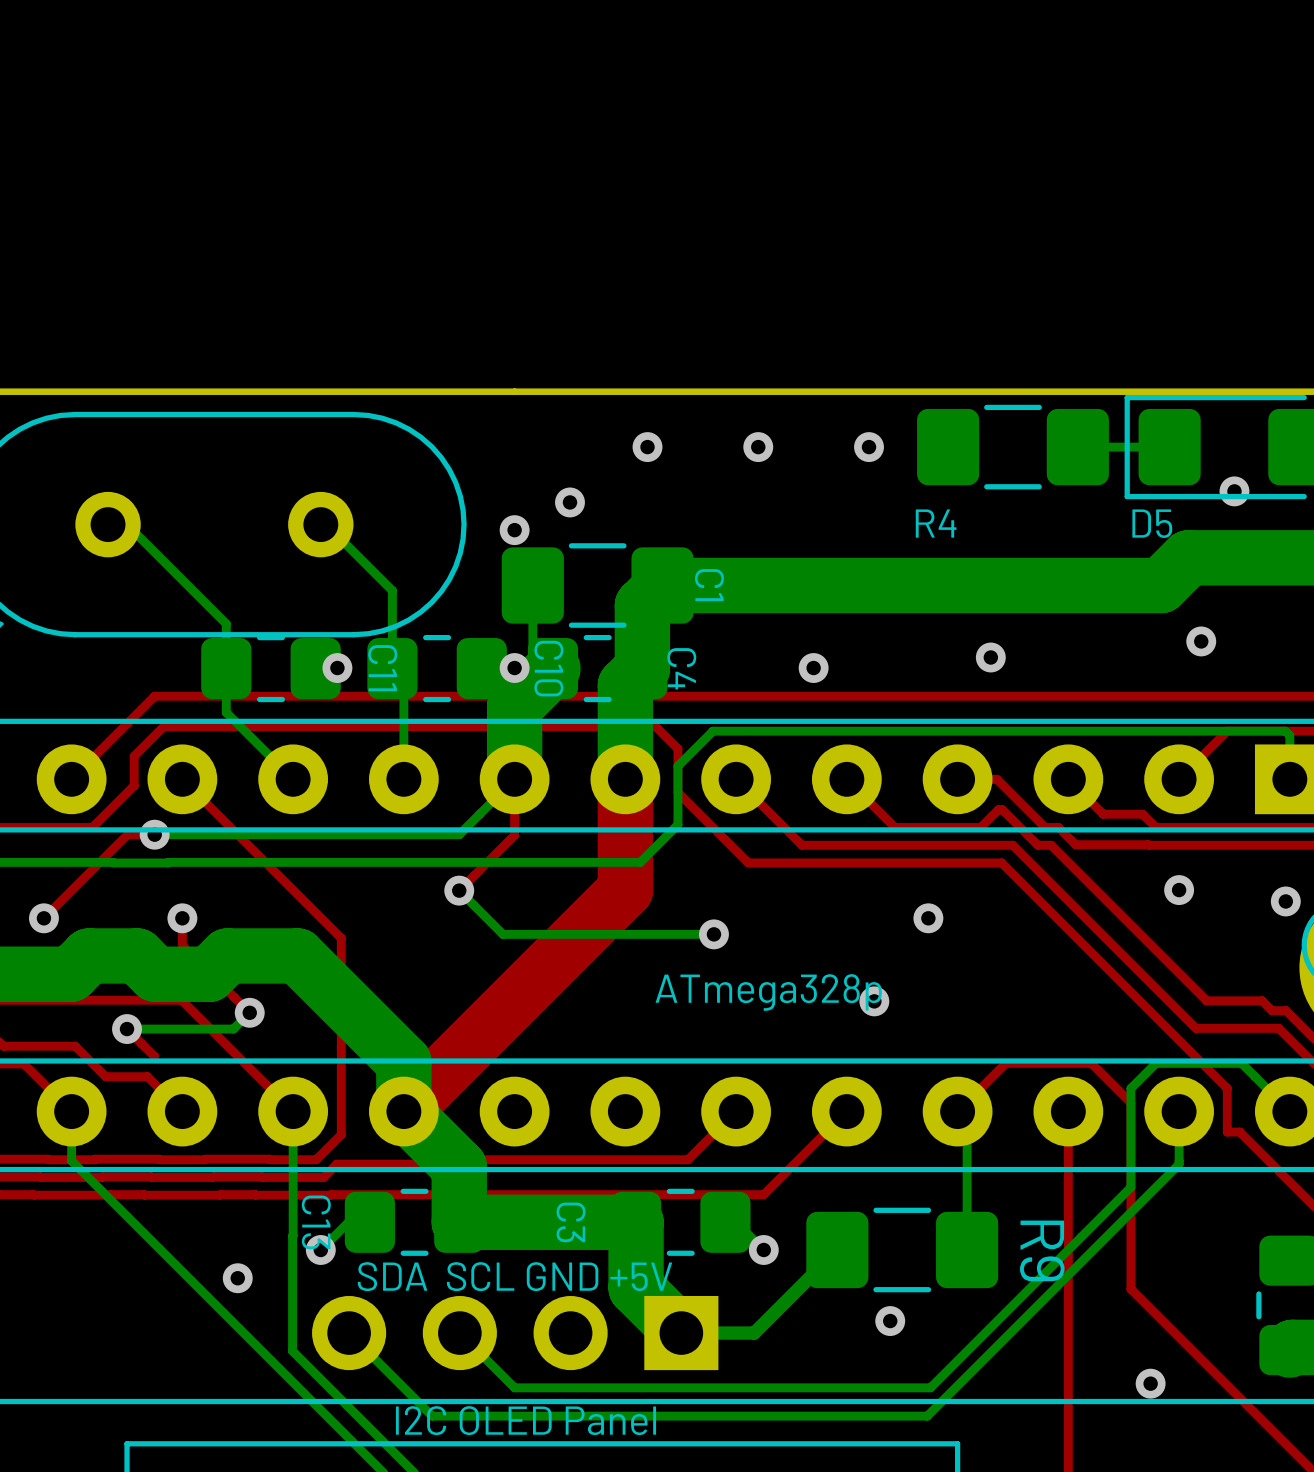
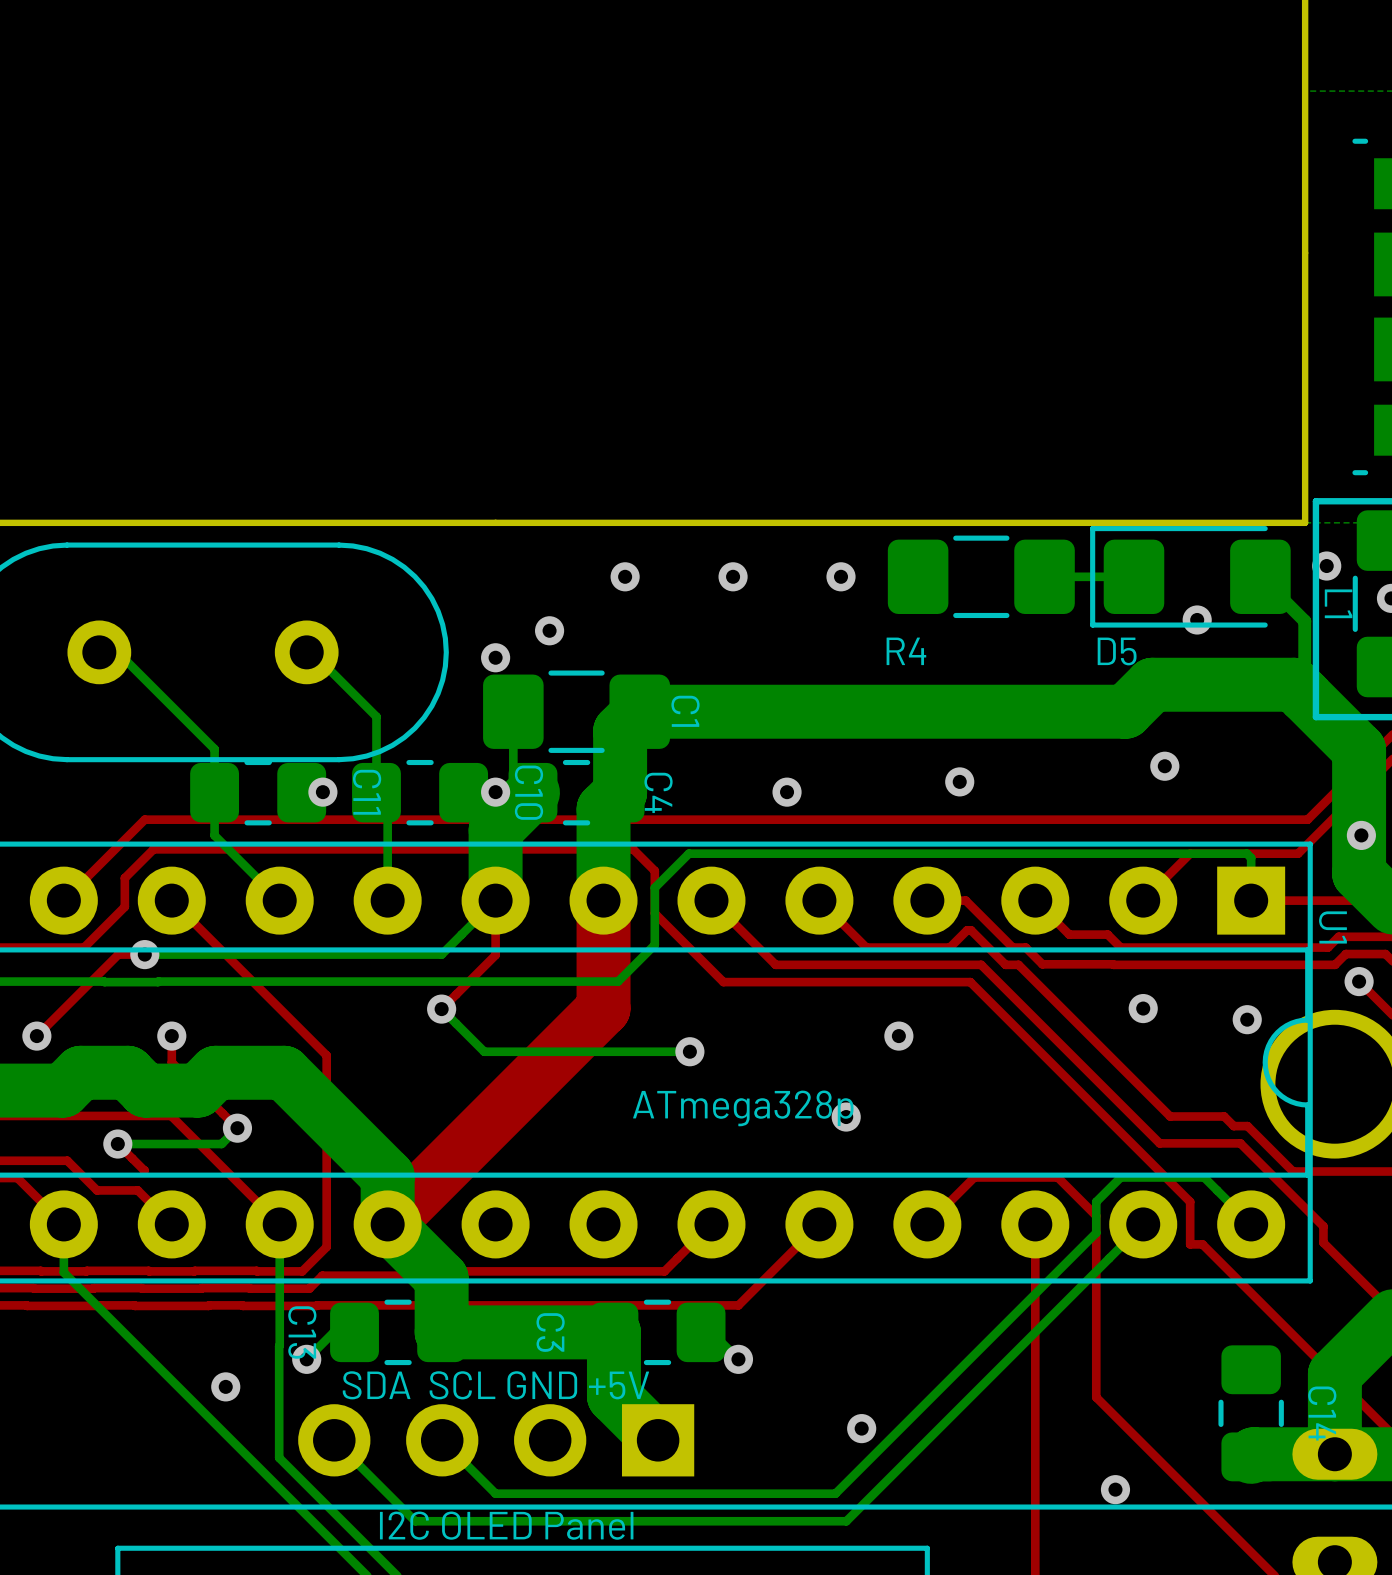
bottom track: (957, 1111) (967, 1121) (967, 1249) -> none
bottom track: (1179, 1111) (1179, 1164) (927, 1416) (874, 1416) -> (1143, 1224) (846, 1521)
bottom track: (1130, 1120) (1130, 1187) (930, 1387) (863, 1387) -> (1096, 1232) (835, 1493)
bottom track: (837, 1249) (754, 1333) (681, 1333) -> none
R9: (902, 1249) -> none

